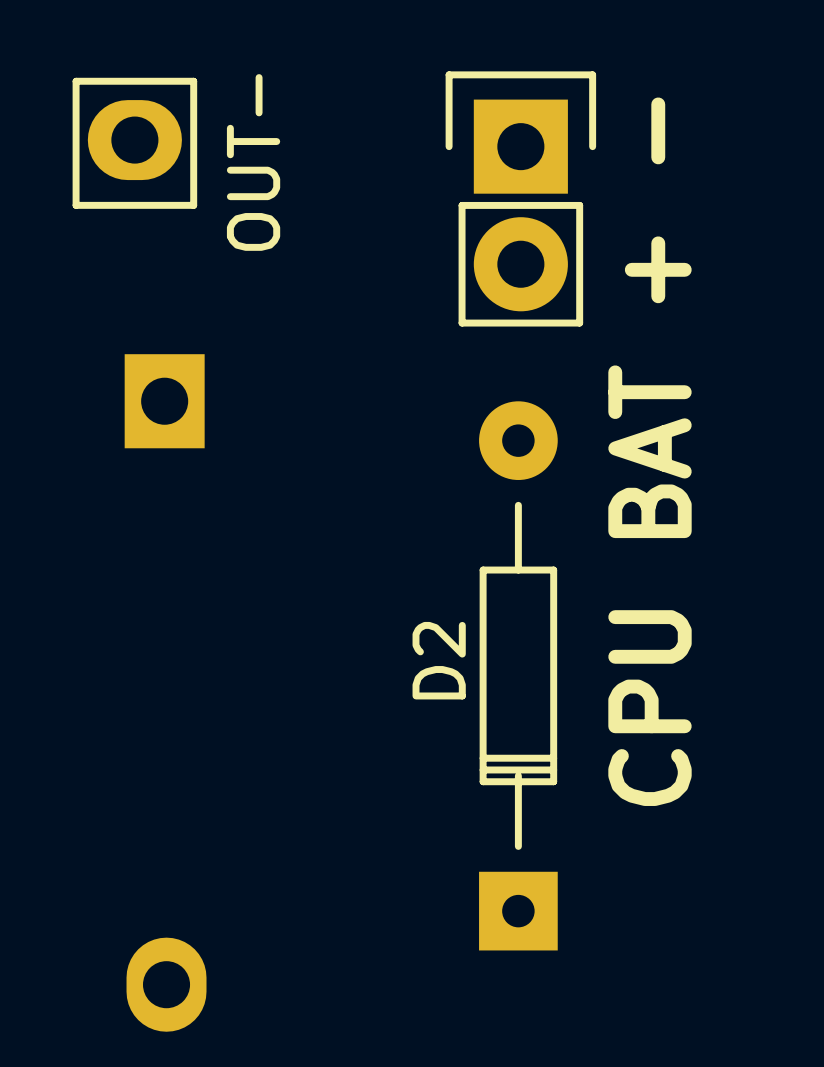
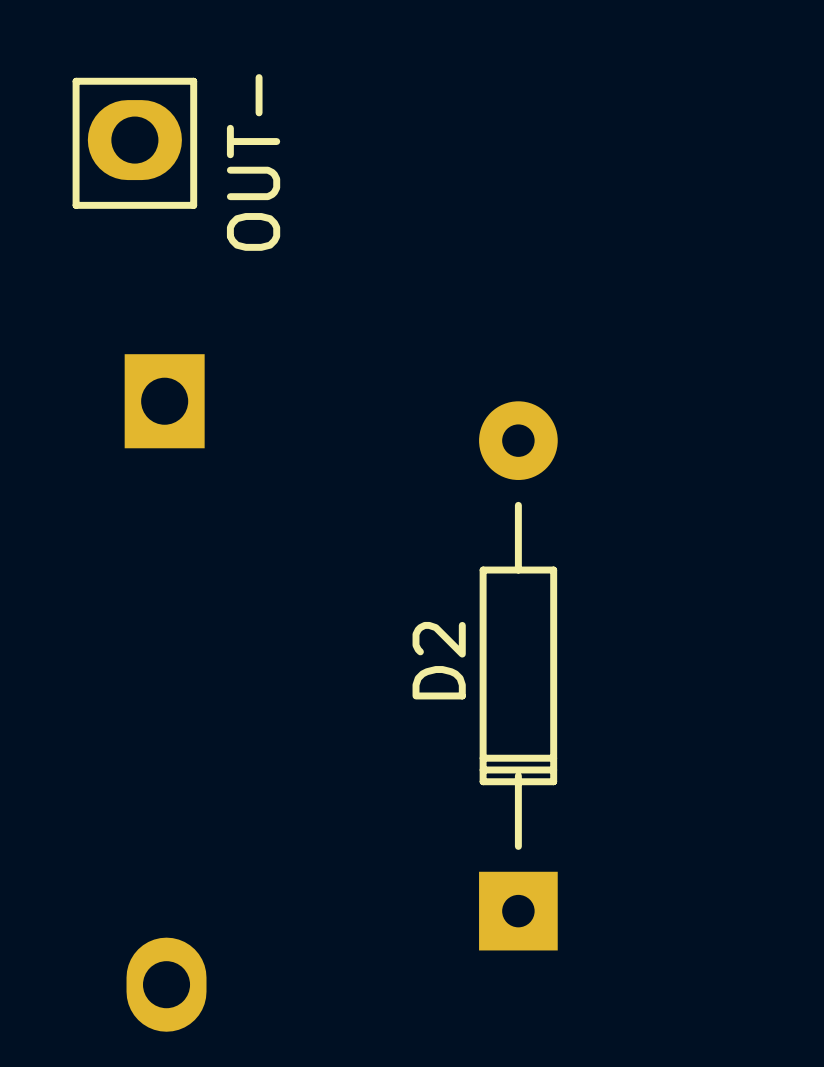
part: (520, 198) -> none
text: CPU BAT + - (650, 451) -> none

